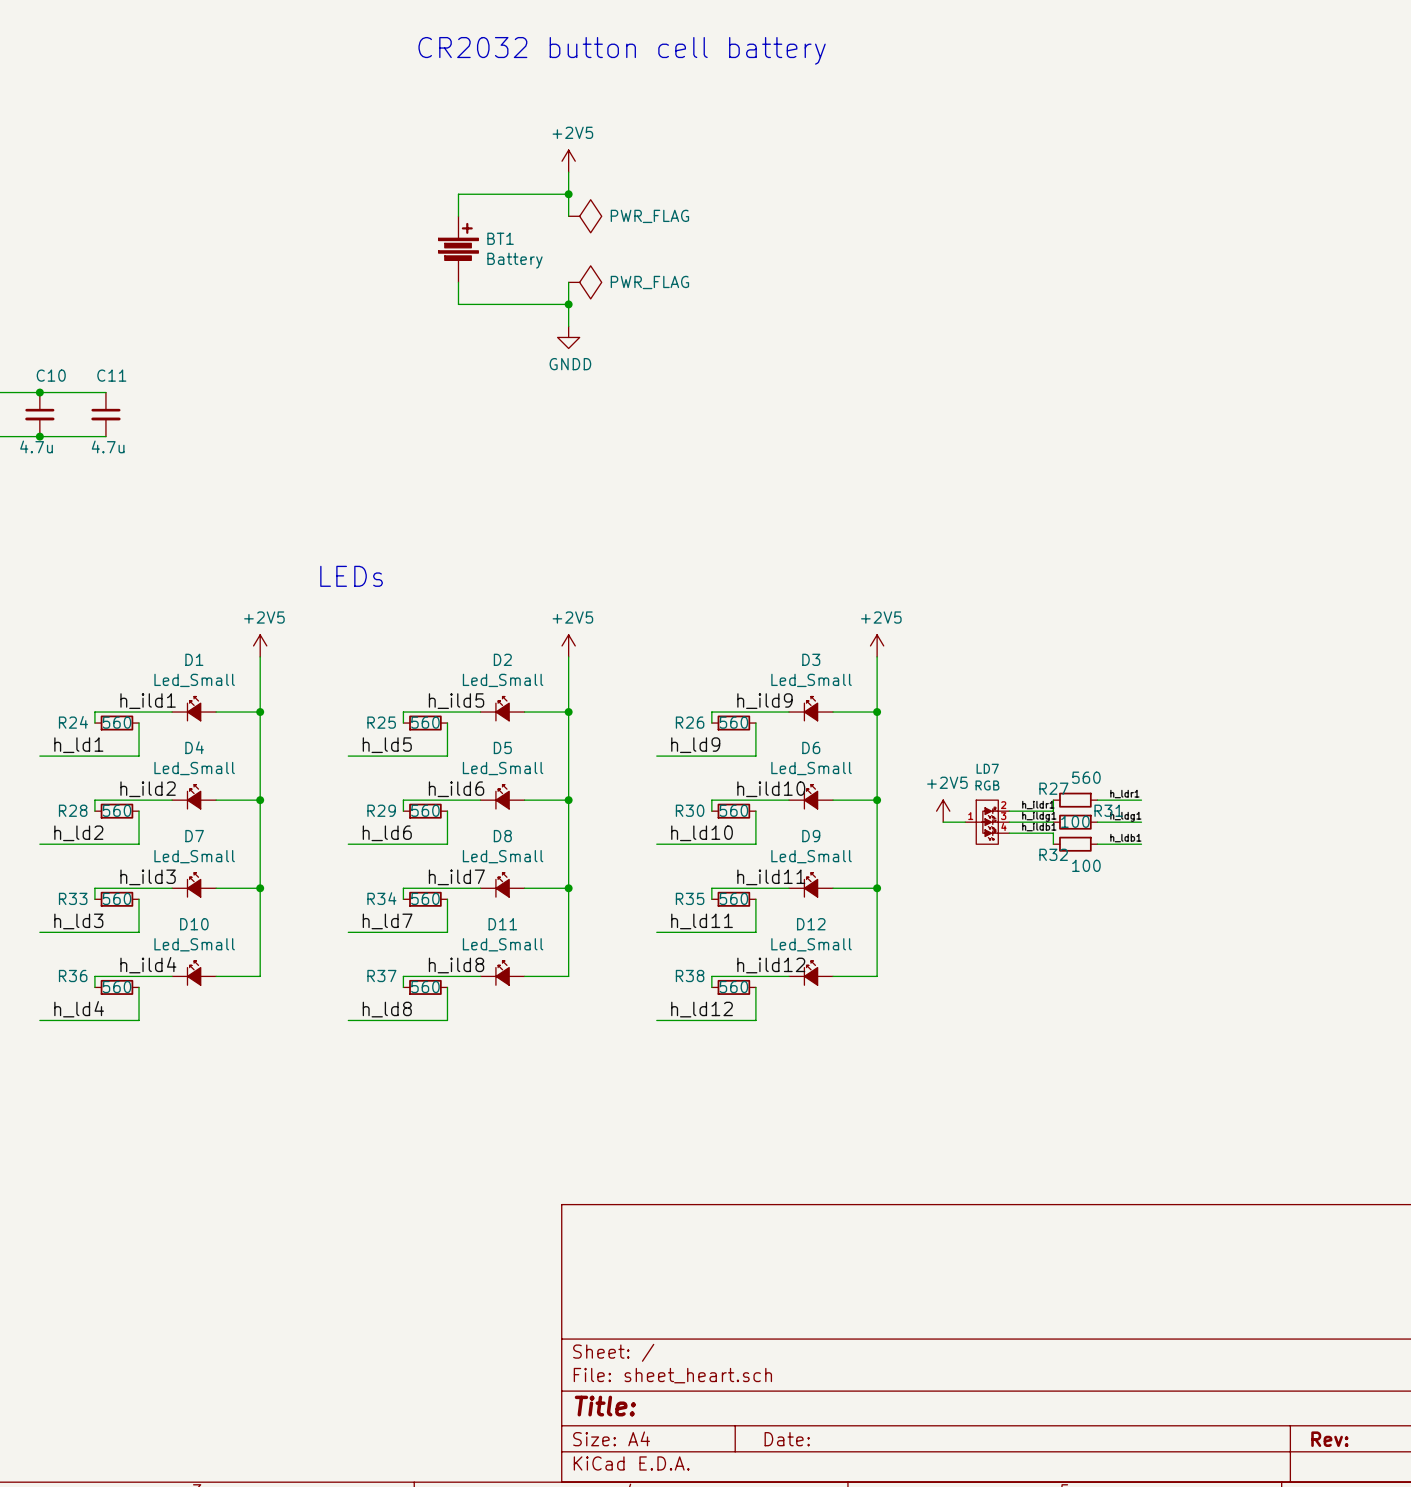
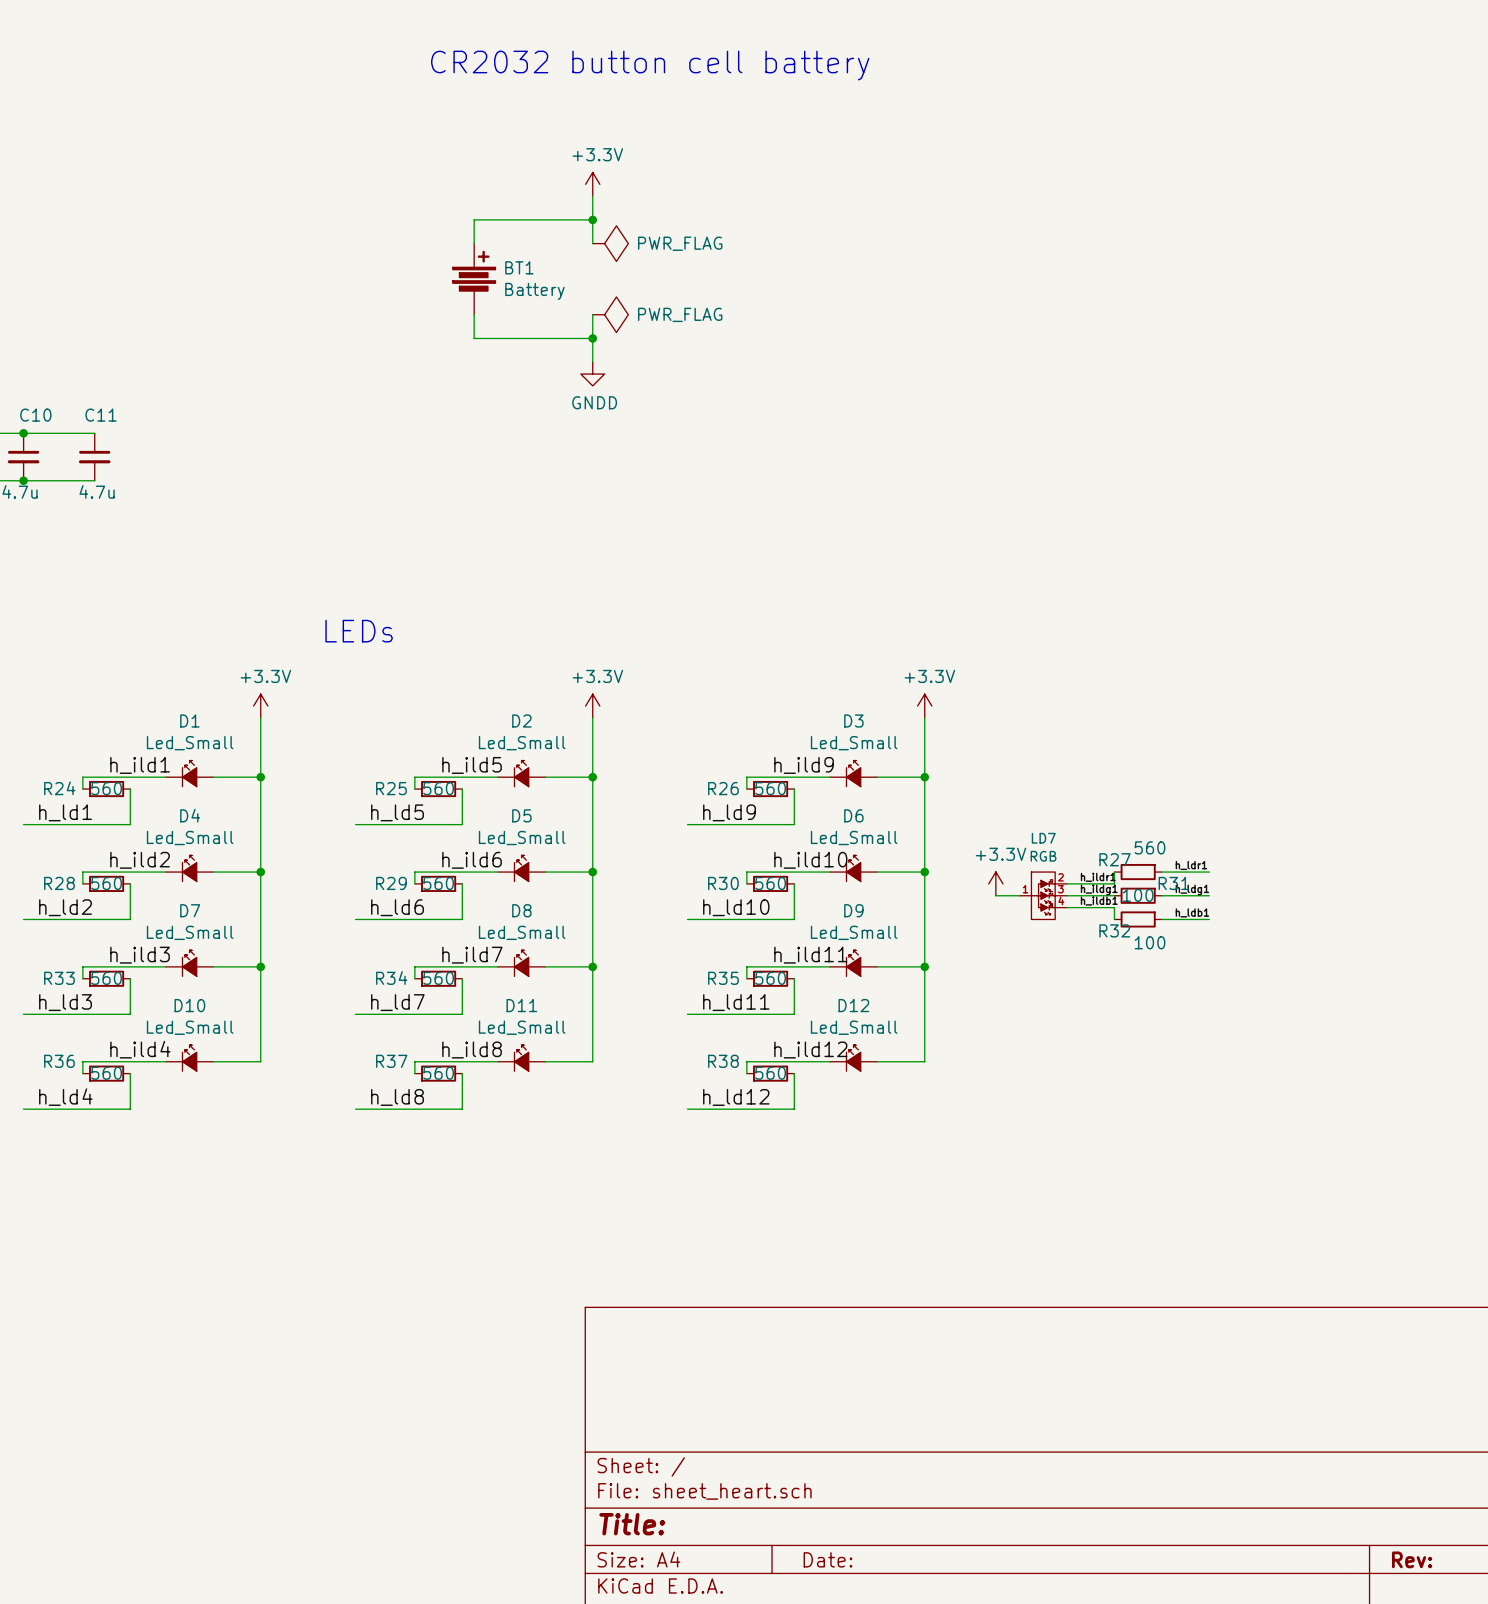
power symbol: +2V5 (568, 161) -> +3.3V (592, 184)
power symbol: +2V5 (260, 645) -> +3.3V (260, 706)
power symbol: +2V5 (568, 645) -> +3.3V (592, 706)
power symbol: +2V5 (877, 645) -> +3.3V (924, 706)
power symbol: +2V5 (943, 811) -> +3.3V (995, 883)

